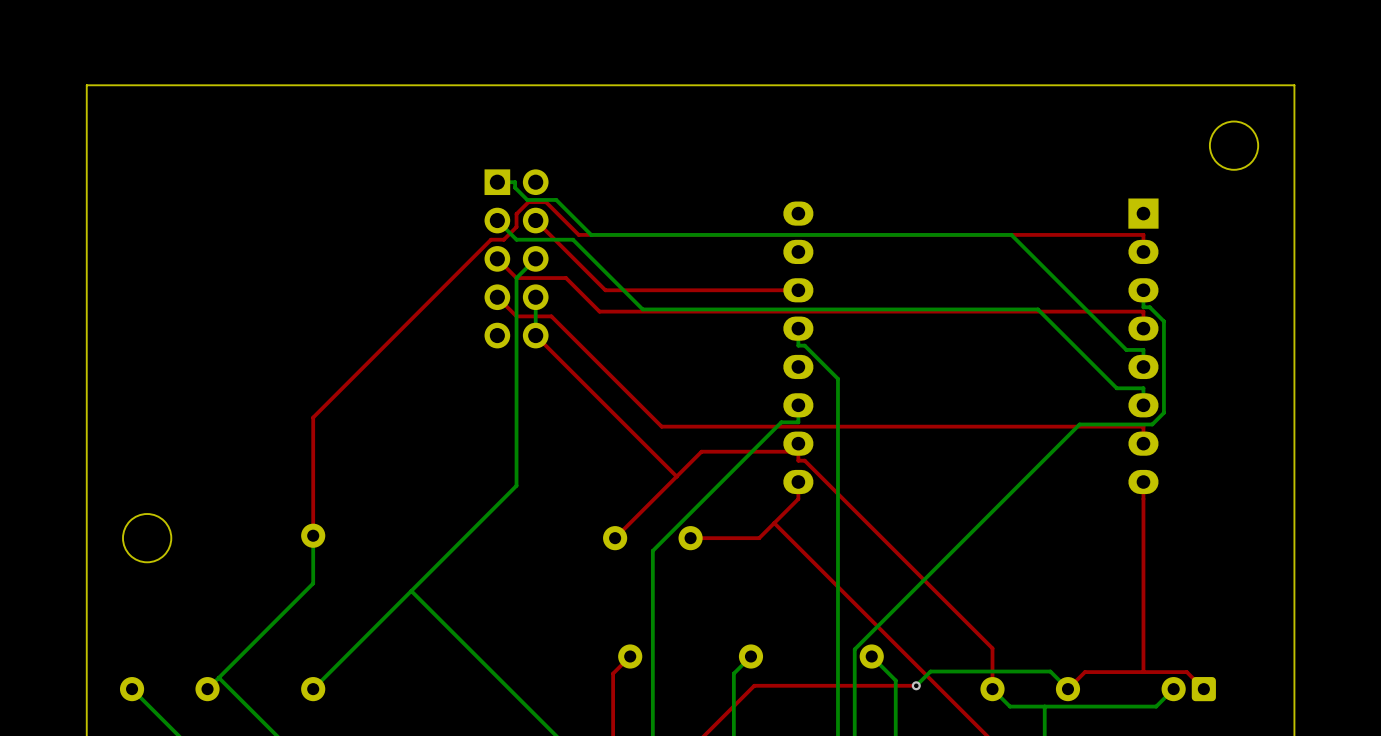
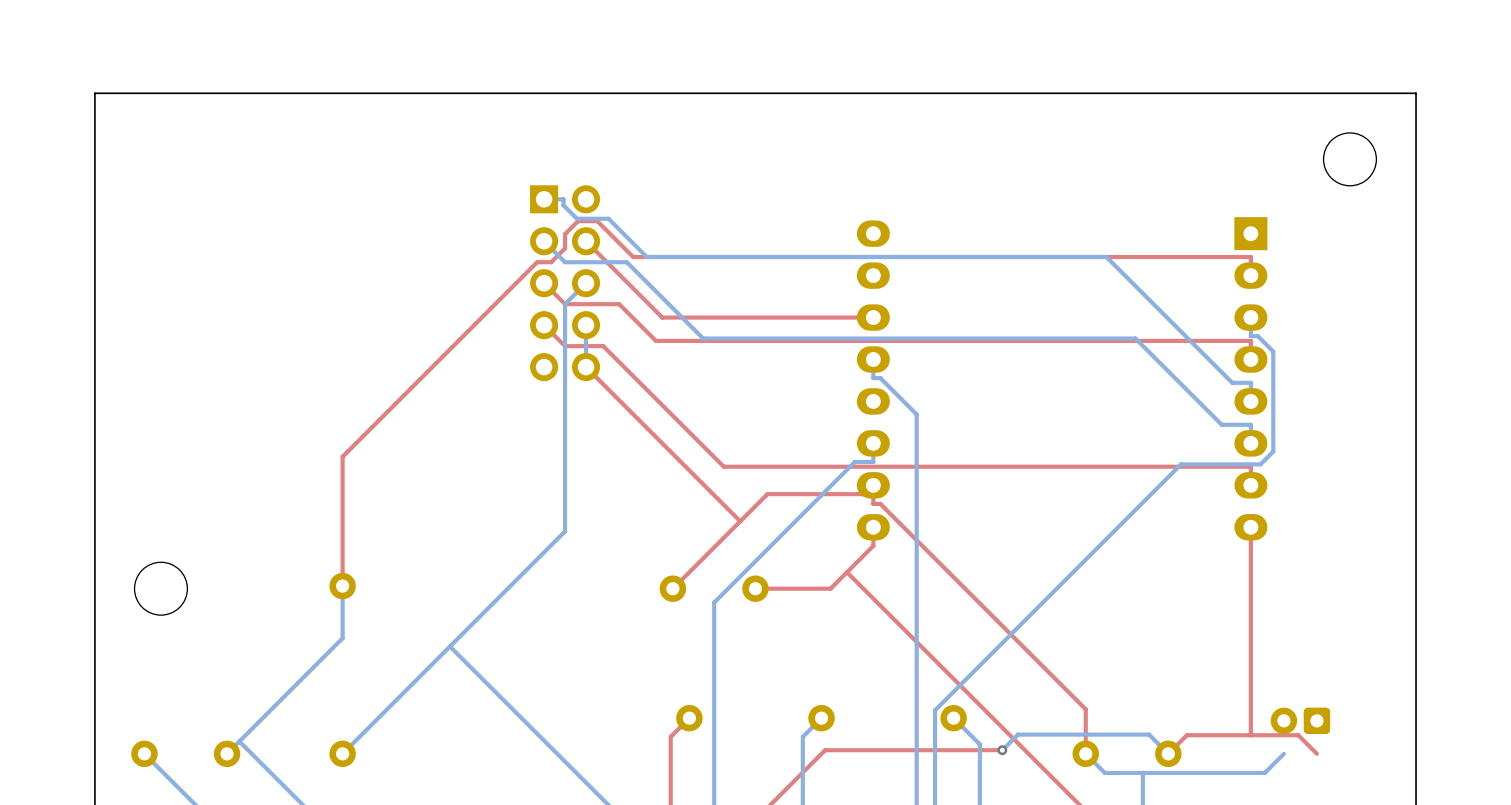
part position: (1188, 689) -> (1300, 720)

